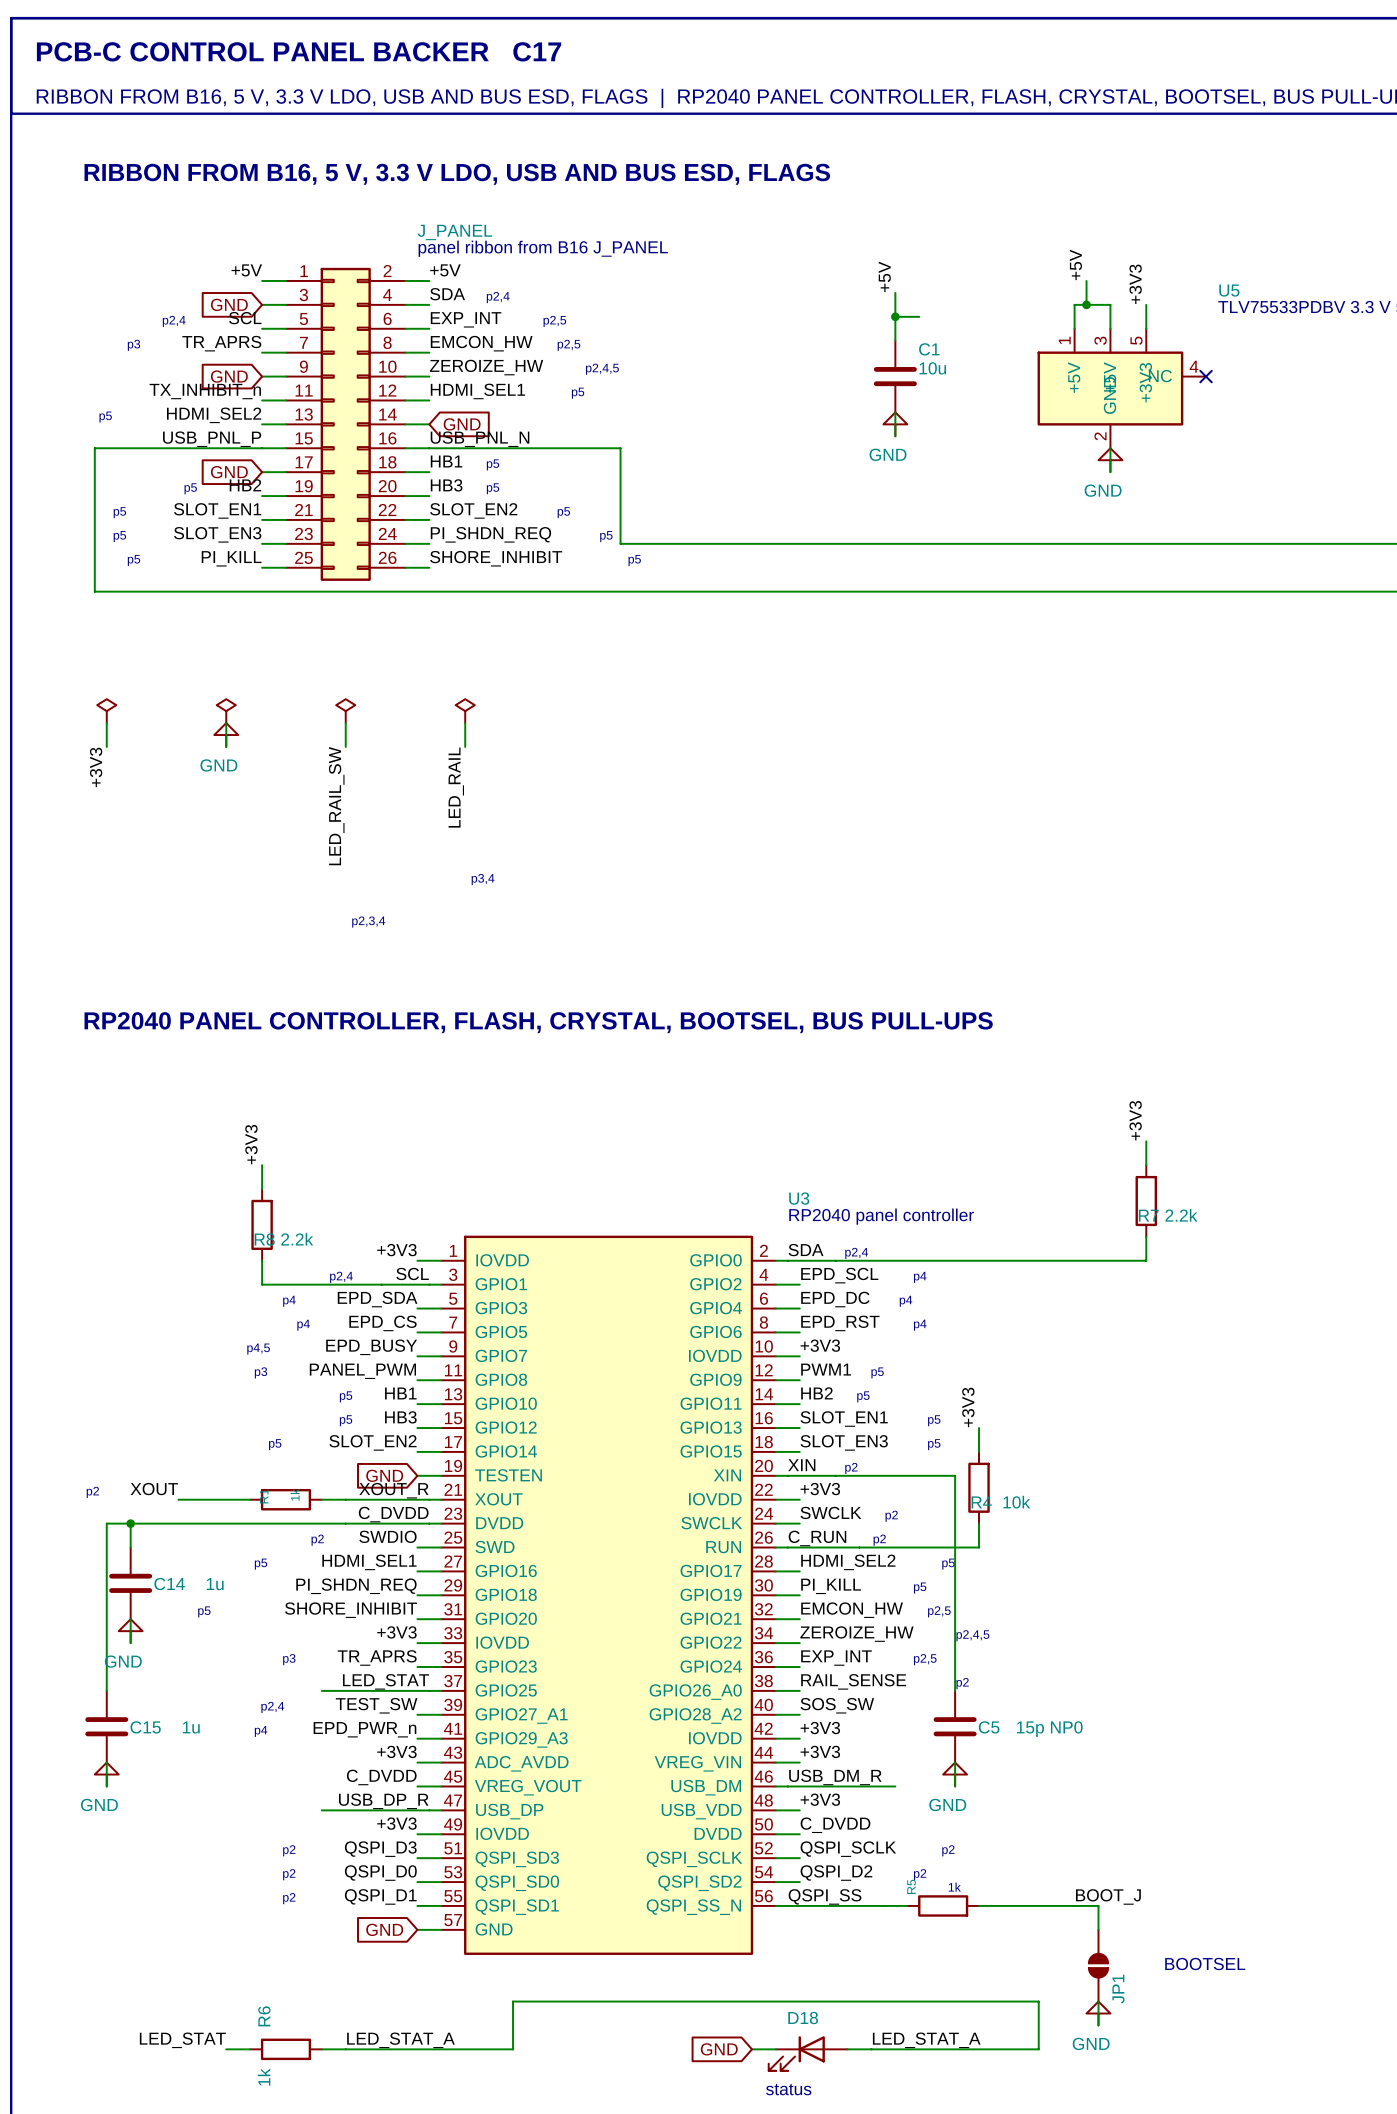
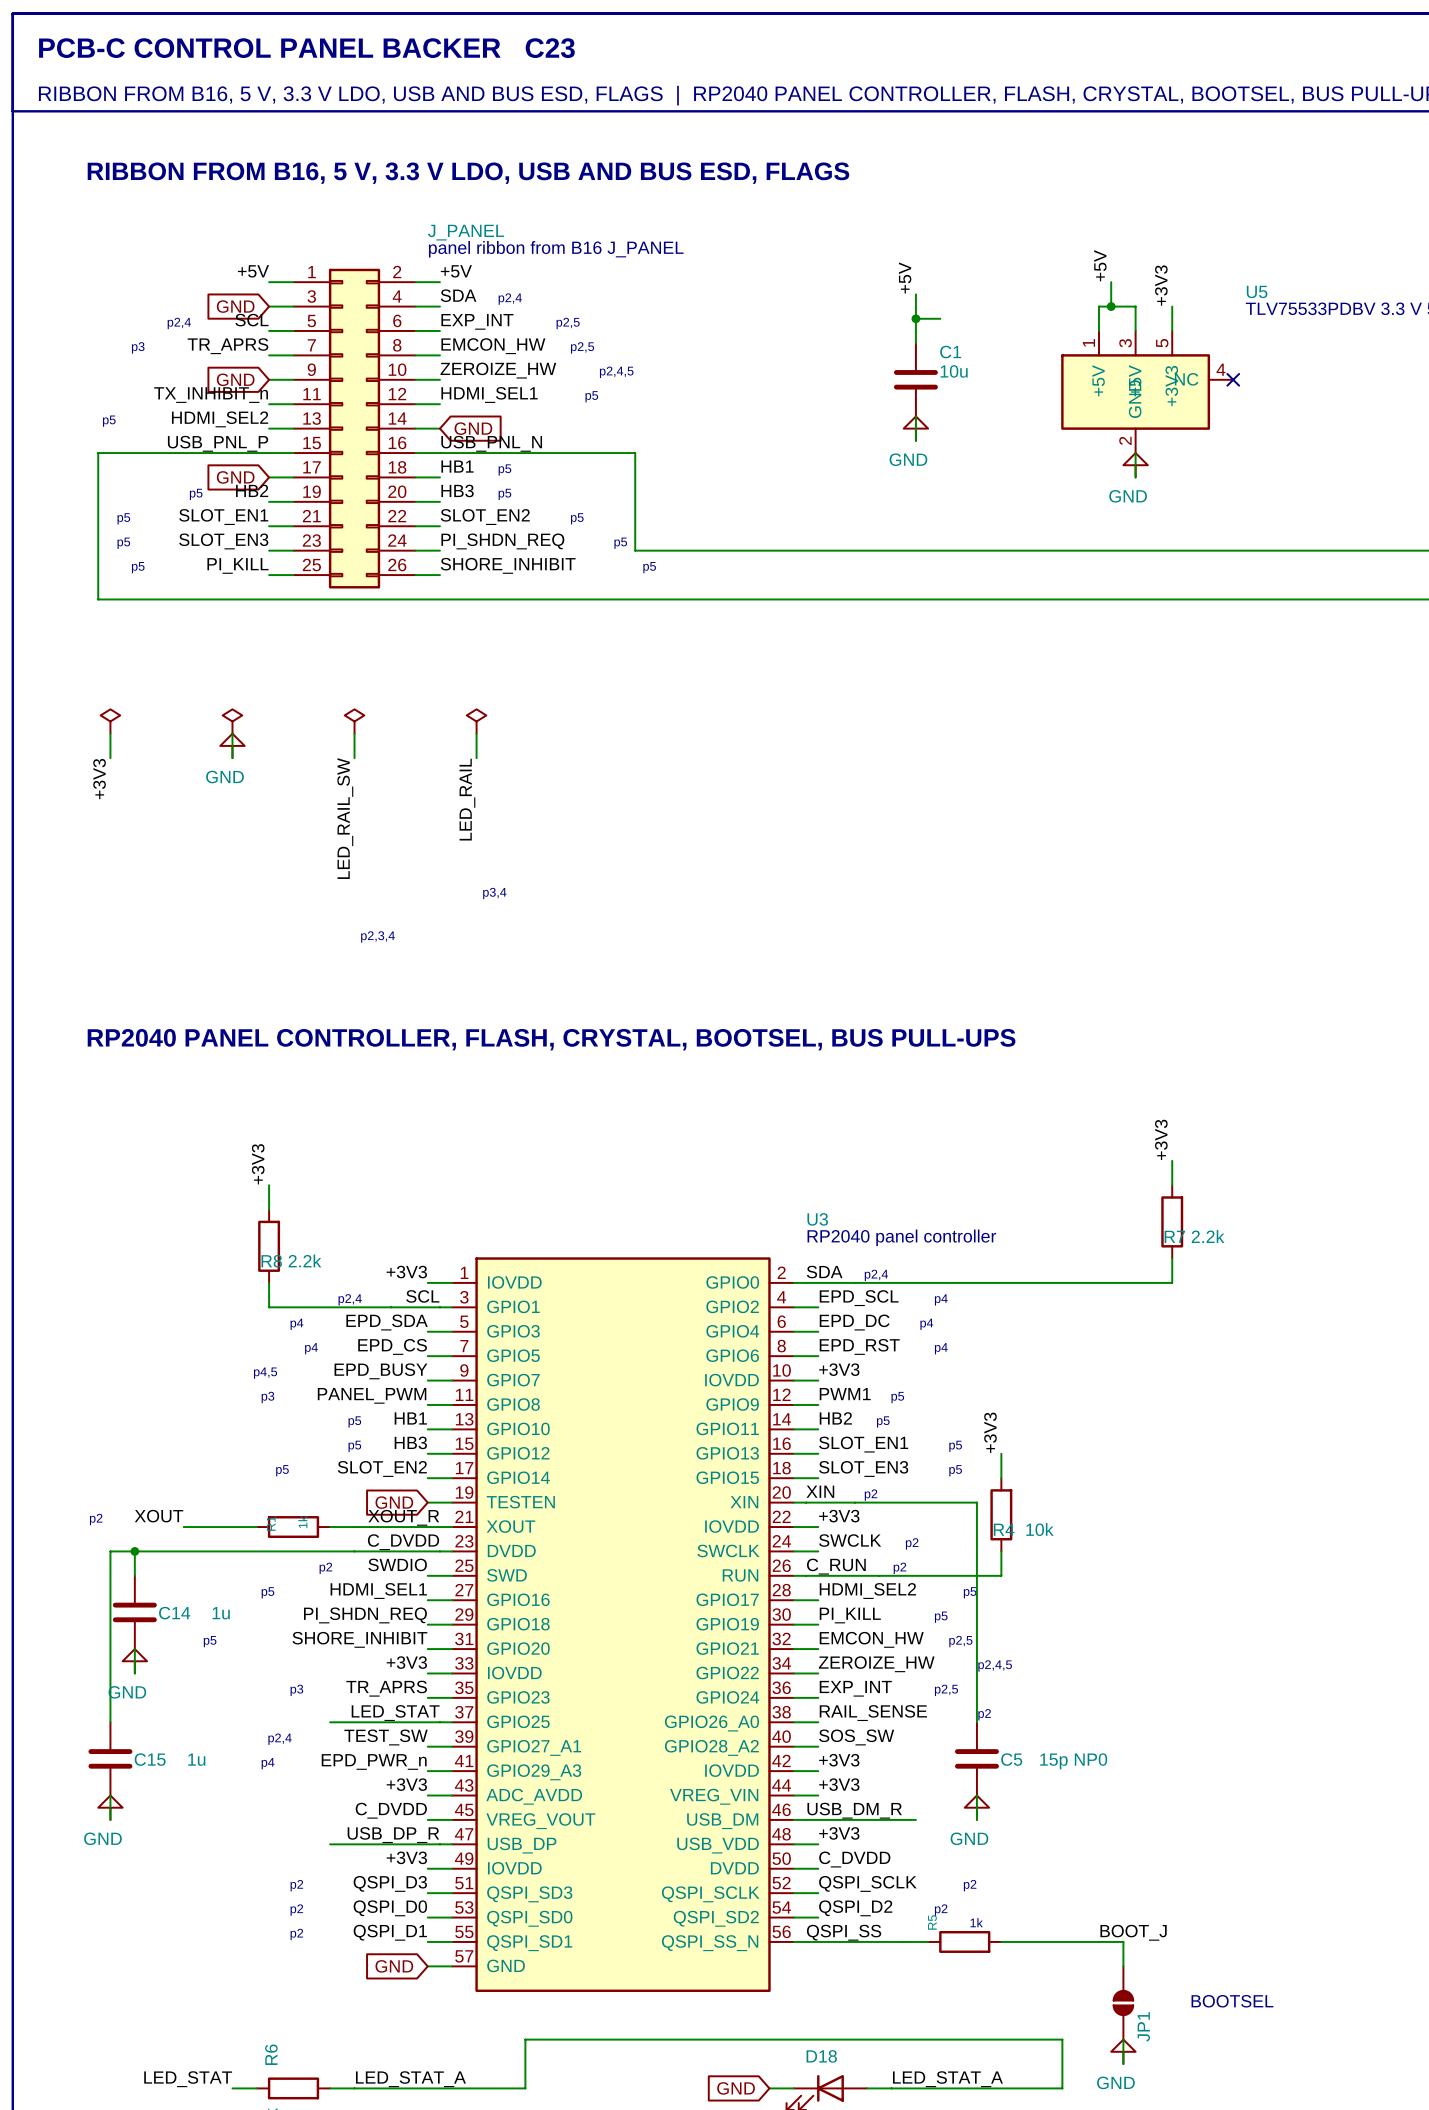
text: PCB-C CONTROL PANEL BACKER C17 (299, 51) -> PCB-C CONTROL PANEL BACKER C23 (306, 48)

